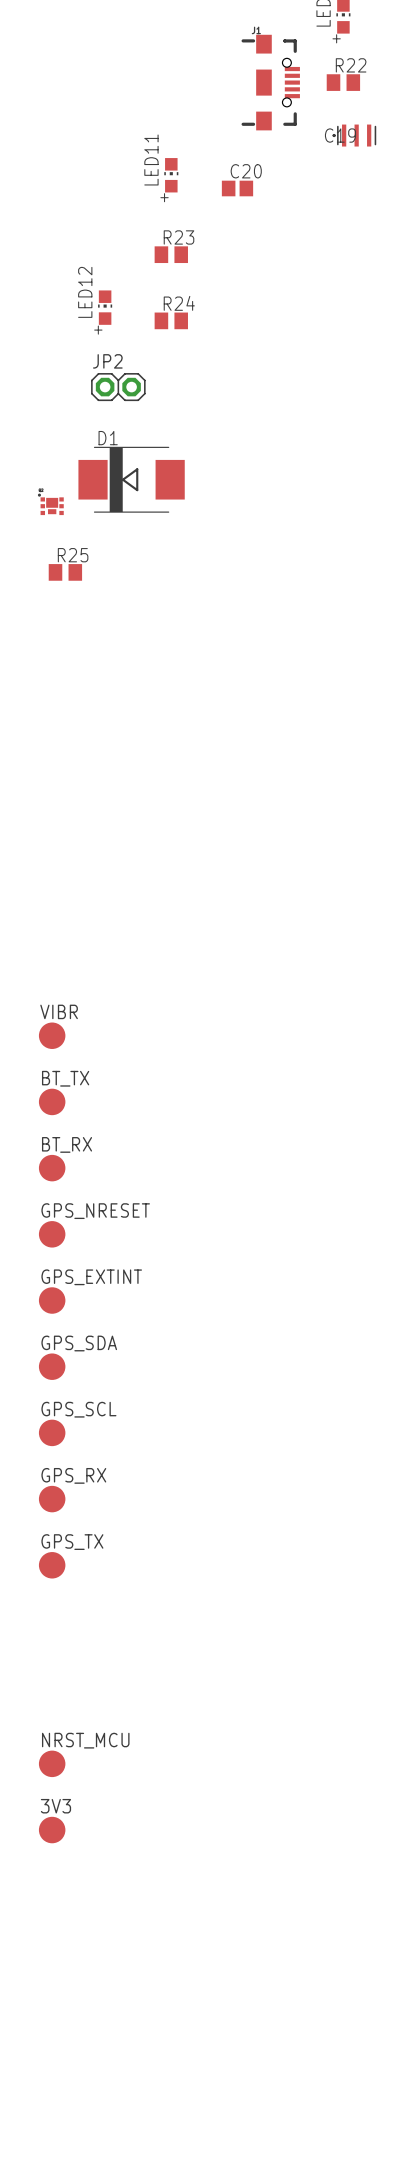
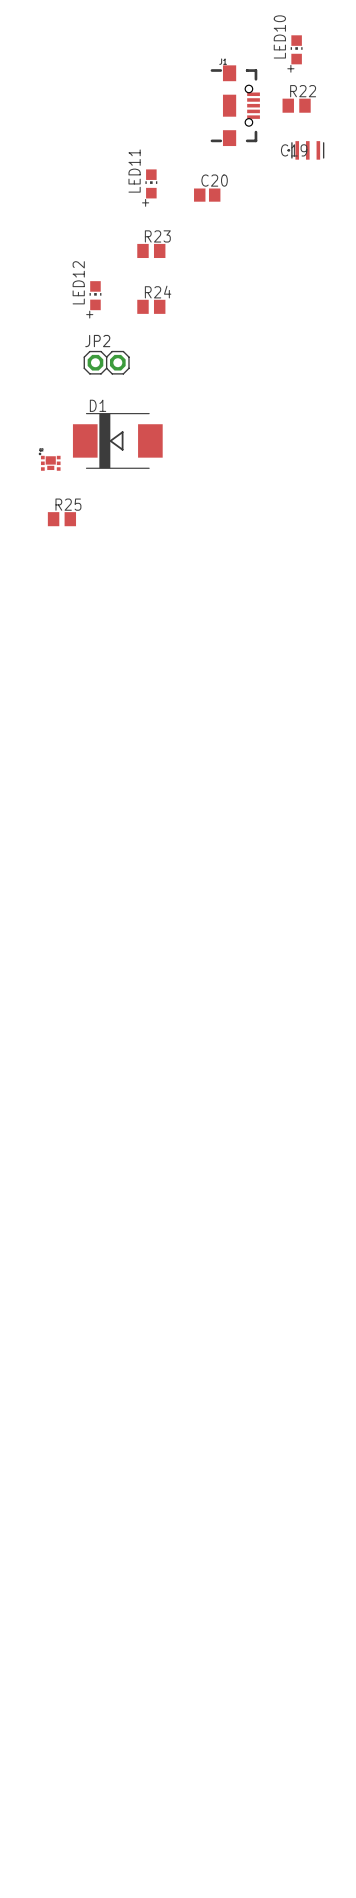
VIBR: (52, 1035) -> none
BT_TX: (52, 1101) -> none
BT_RX: (52, 1168) -> none
GPS_NRESET: (52, 1234) -> none
GPS_EXTINT: (52, 1300) -> none
GPS_SDA: (52, 1366) -> none
GPS_SCL: (52, 1432) -> none
GPS_RX: (52, 1499) -> none
GPS_TX: (52, 1565) -> none
NRST_MCU: (52, 1763) -> none
3V3: (52, 1830) -> none

